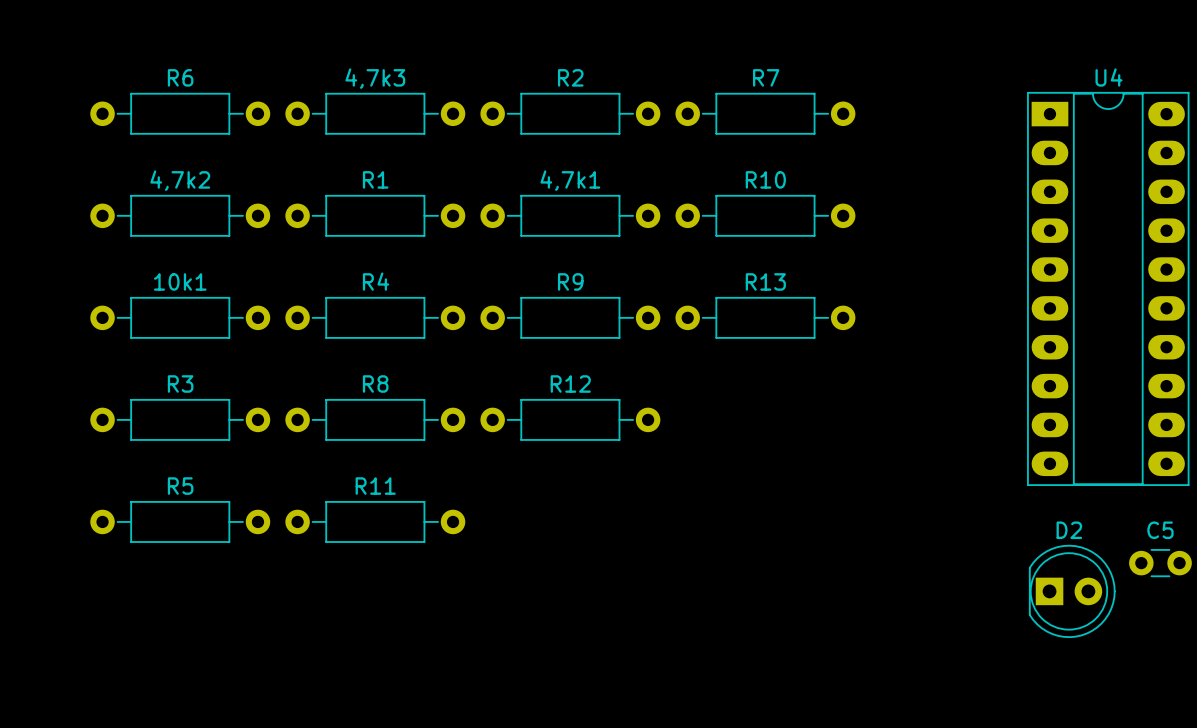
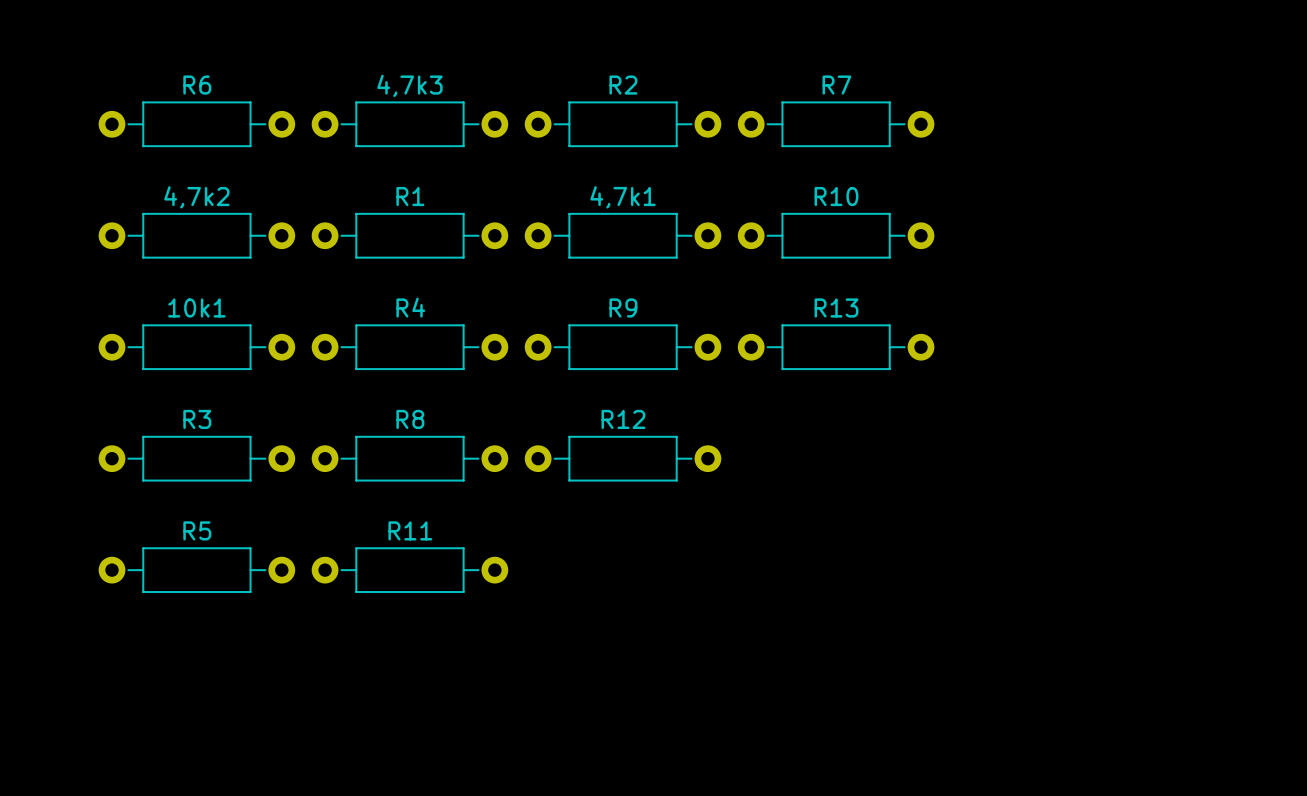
U4: (1108, 288) -> none
C5: (1160, 563) -> none
D2: (1072, 591) -> none

